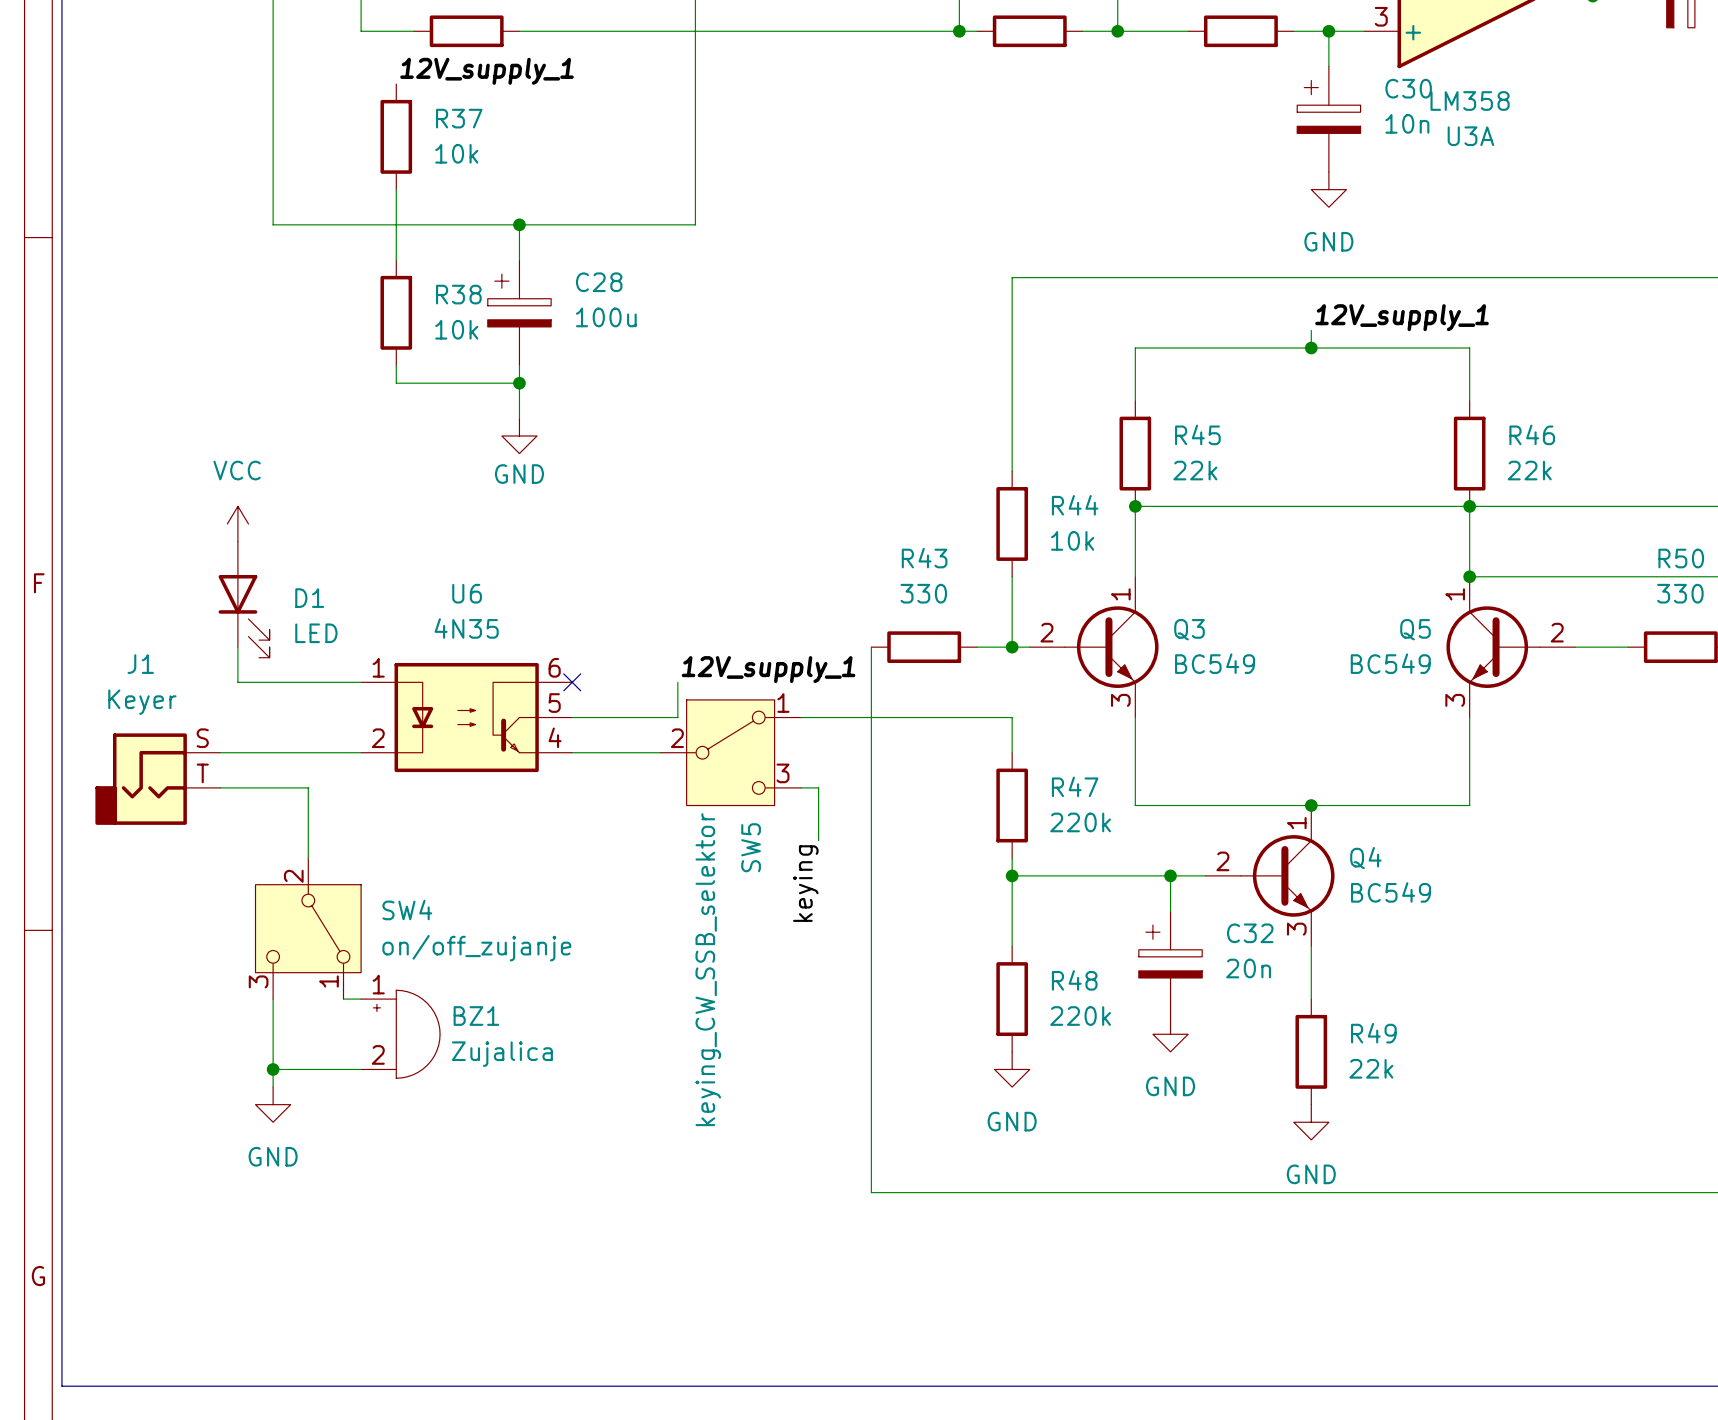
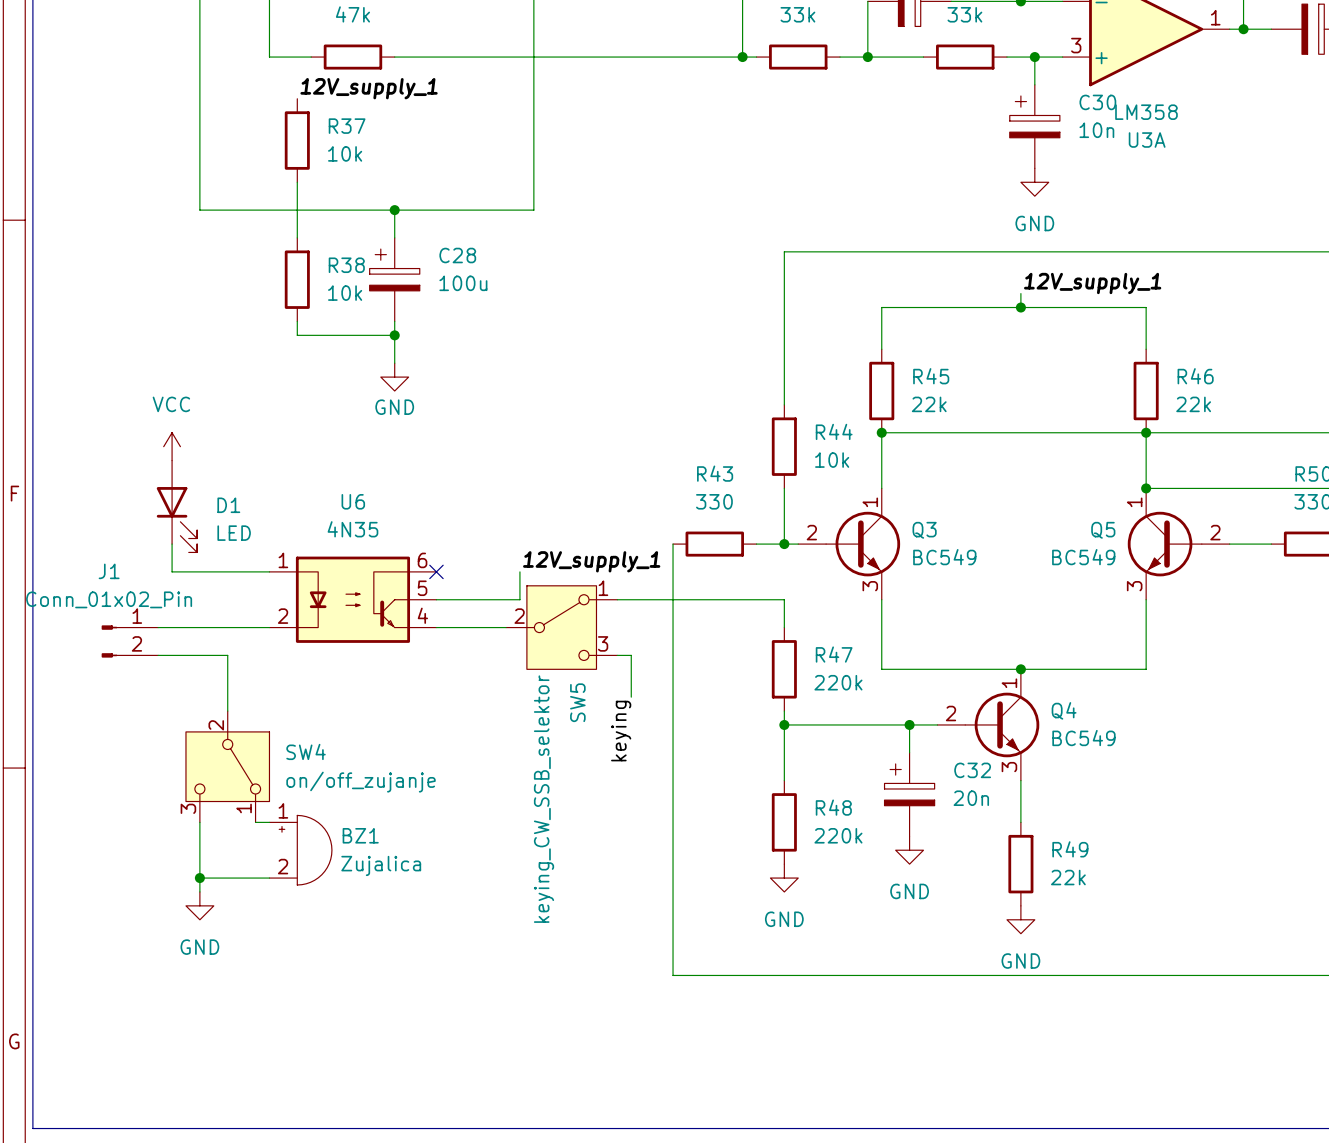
J1 name position: J1 (140, 664) -> J1 (109, 571)
J1 value: Keyer (142, 702) -> Conn_01x02_Pin (109, 599)
J1 symbol: [95, 733, 221, 825] -> [101, 625, 159, 658]

